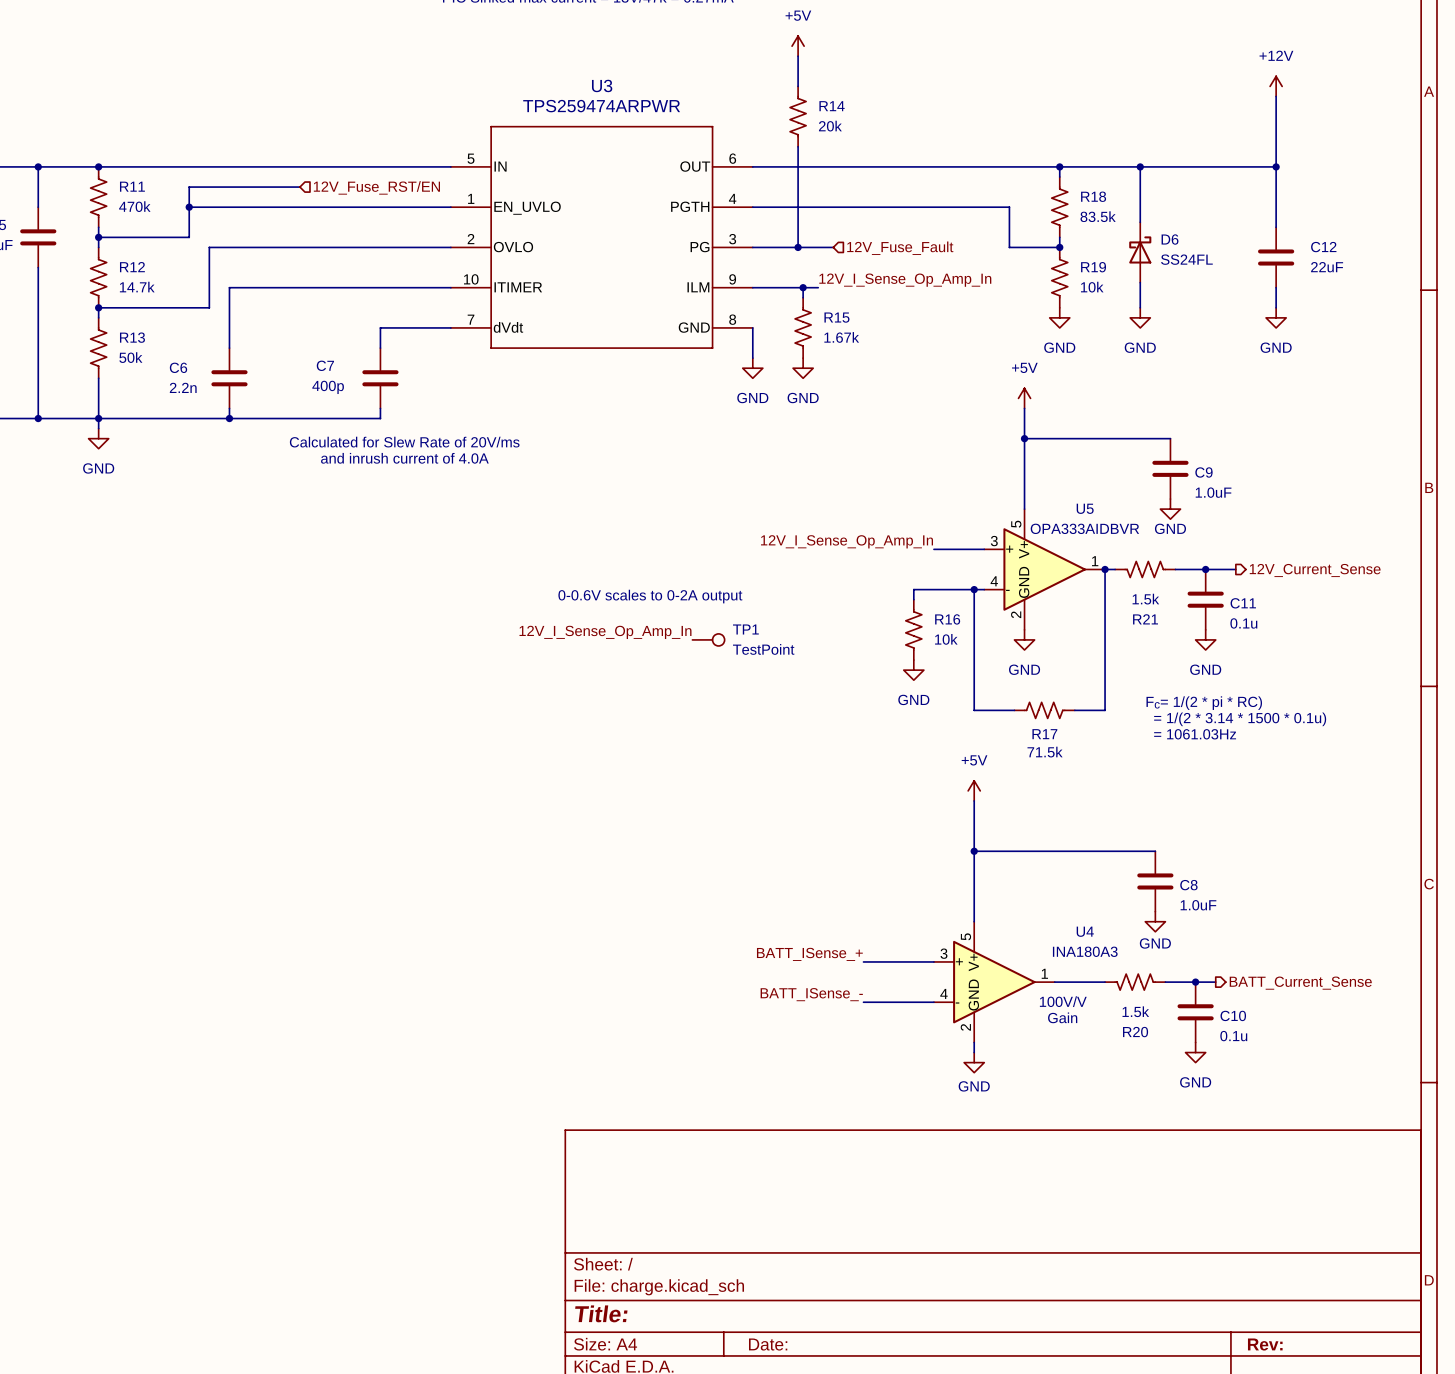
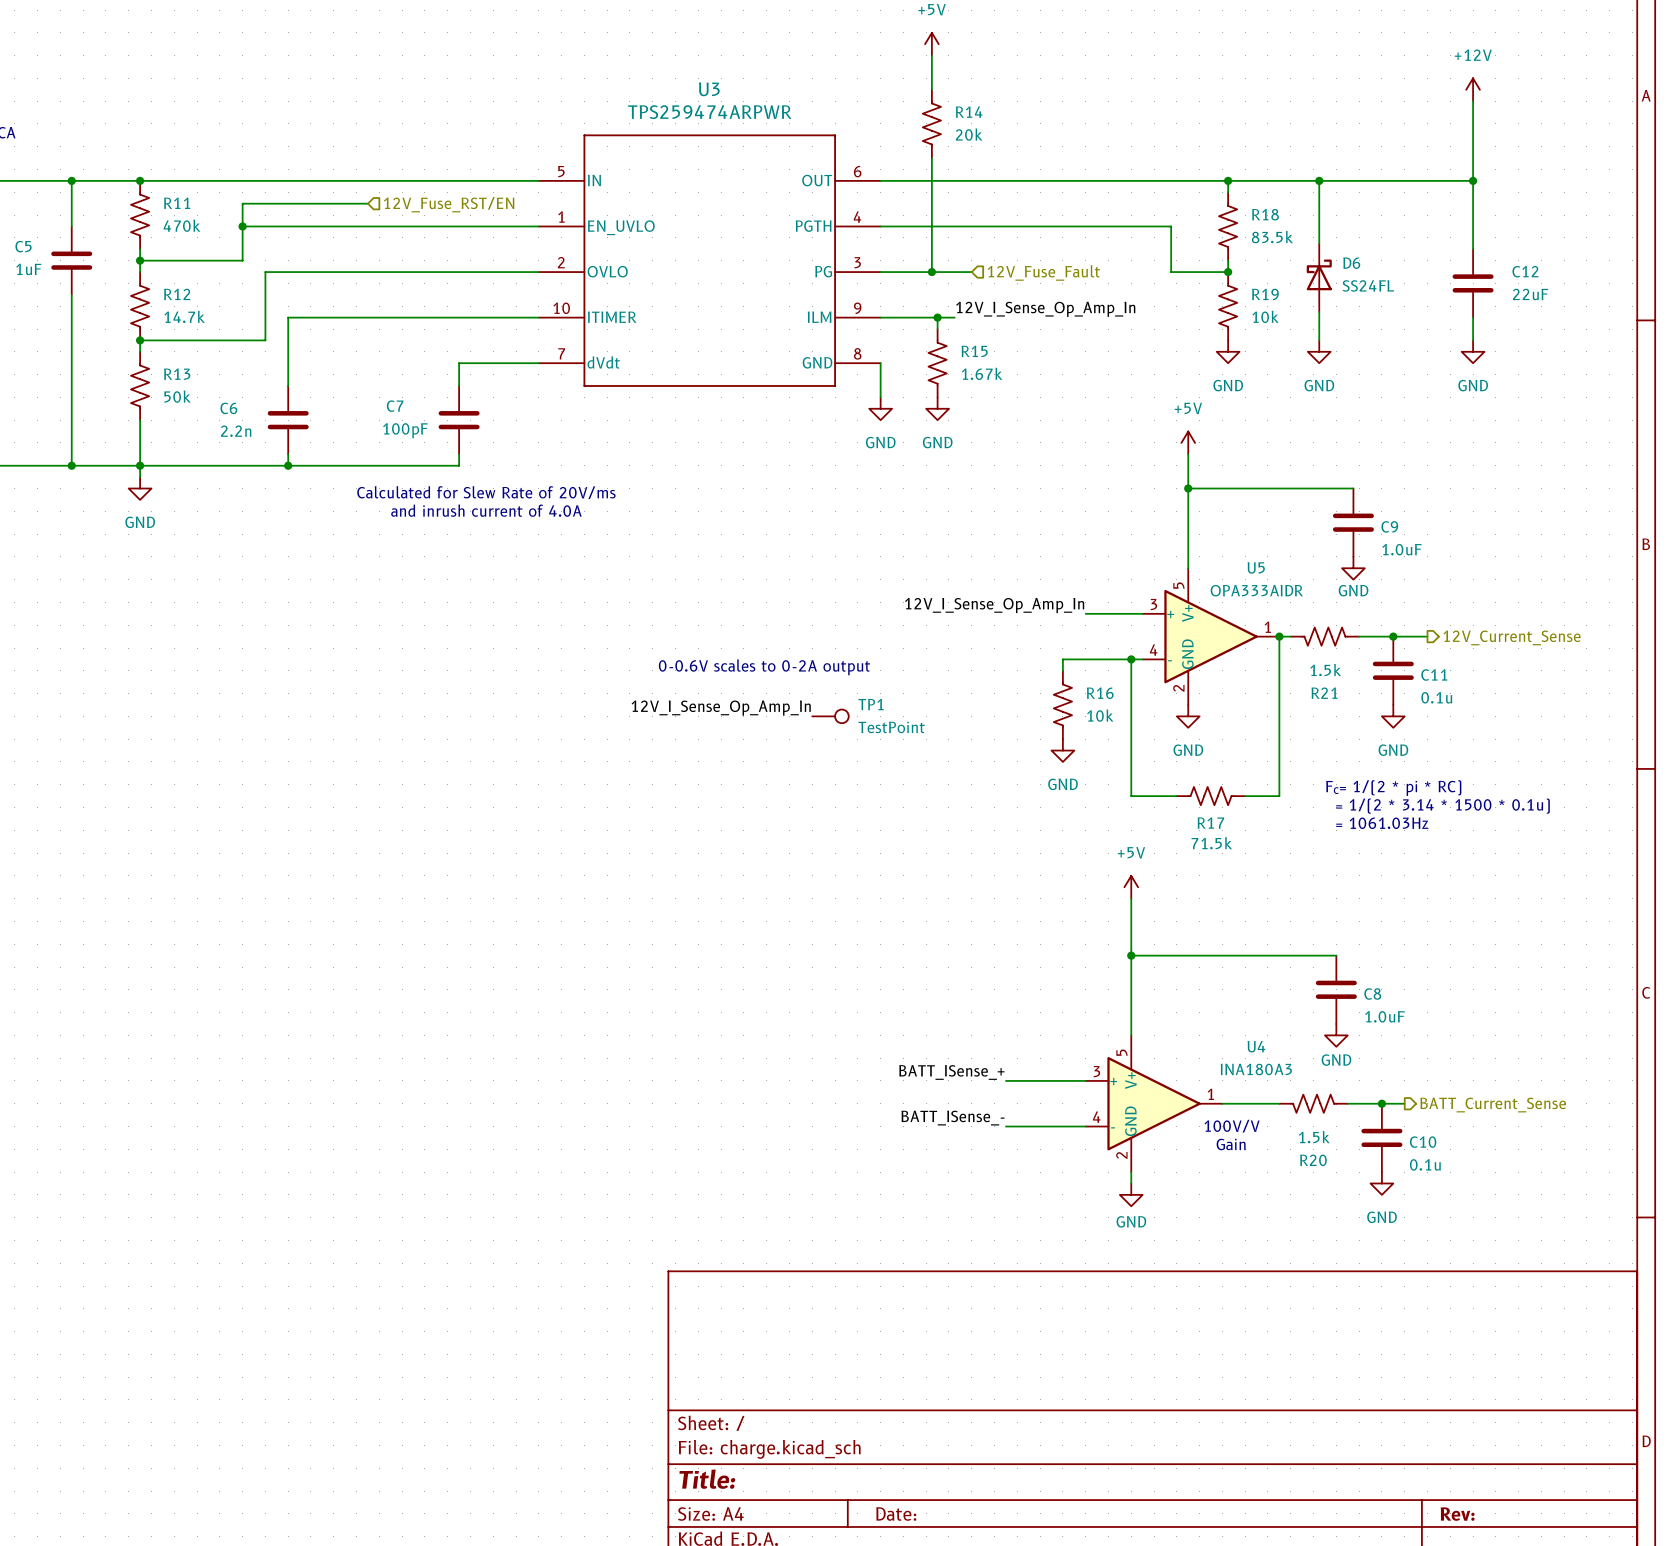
C7 value: 400p (328, 387) -> 100pF (405, 430)
U5 value: OPA333AIDBVR (1084, 528) -> OPA333AIDR (1256, 590)

